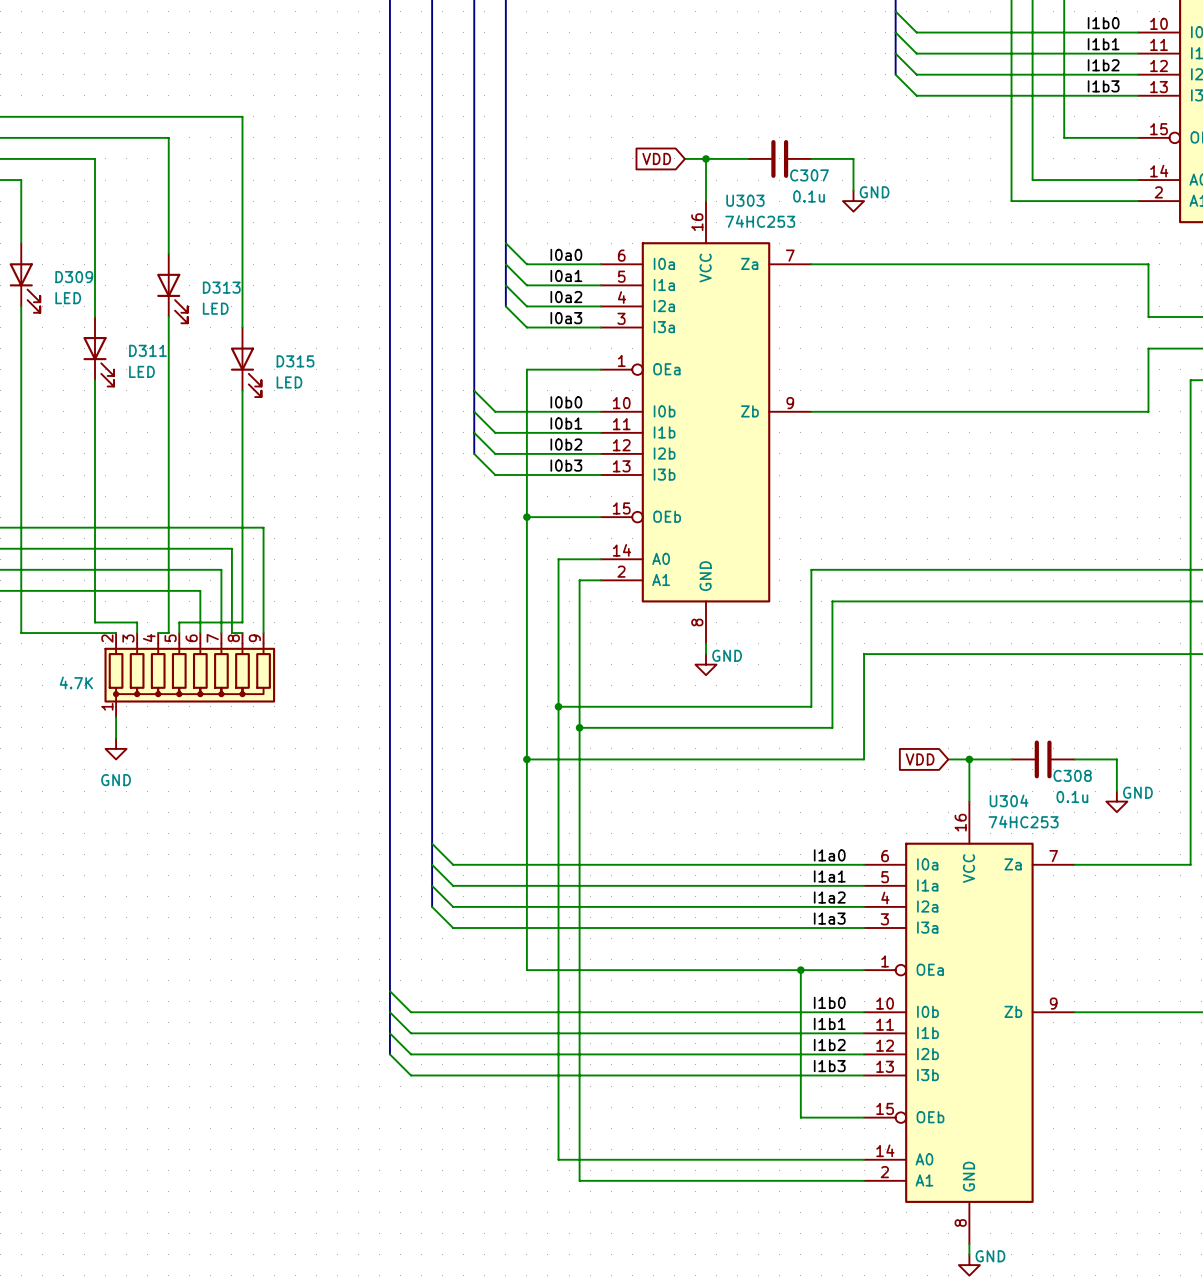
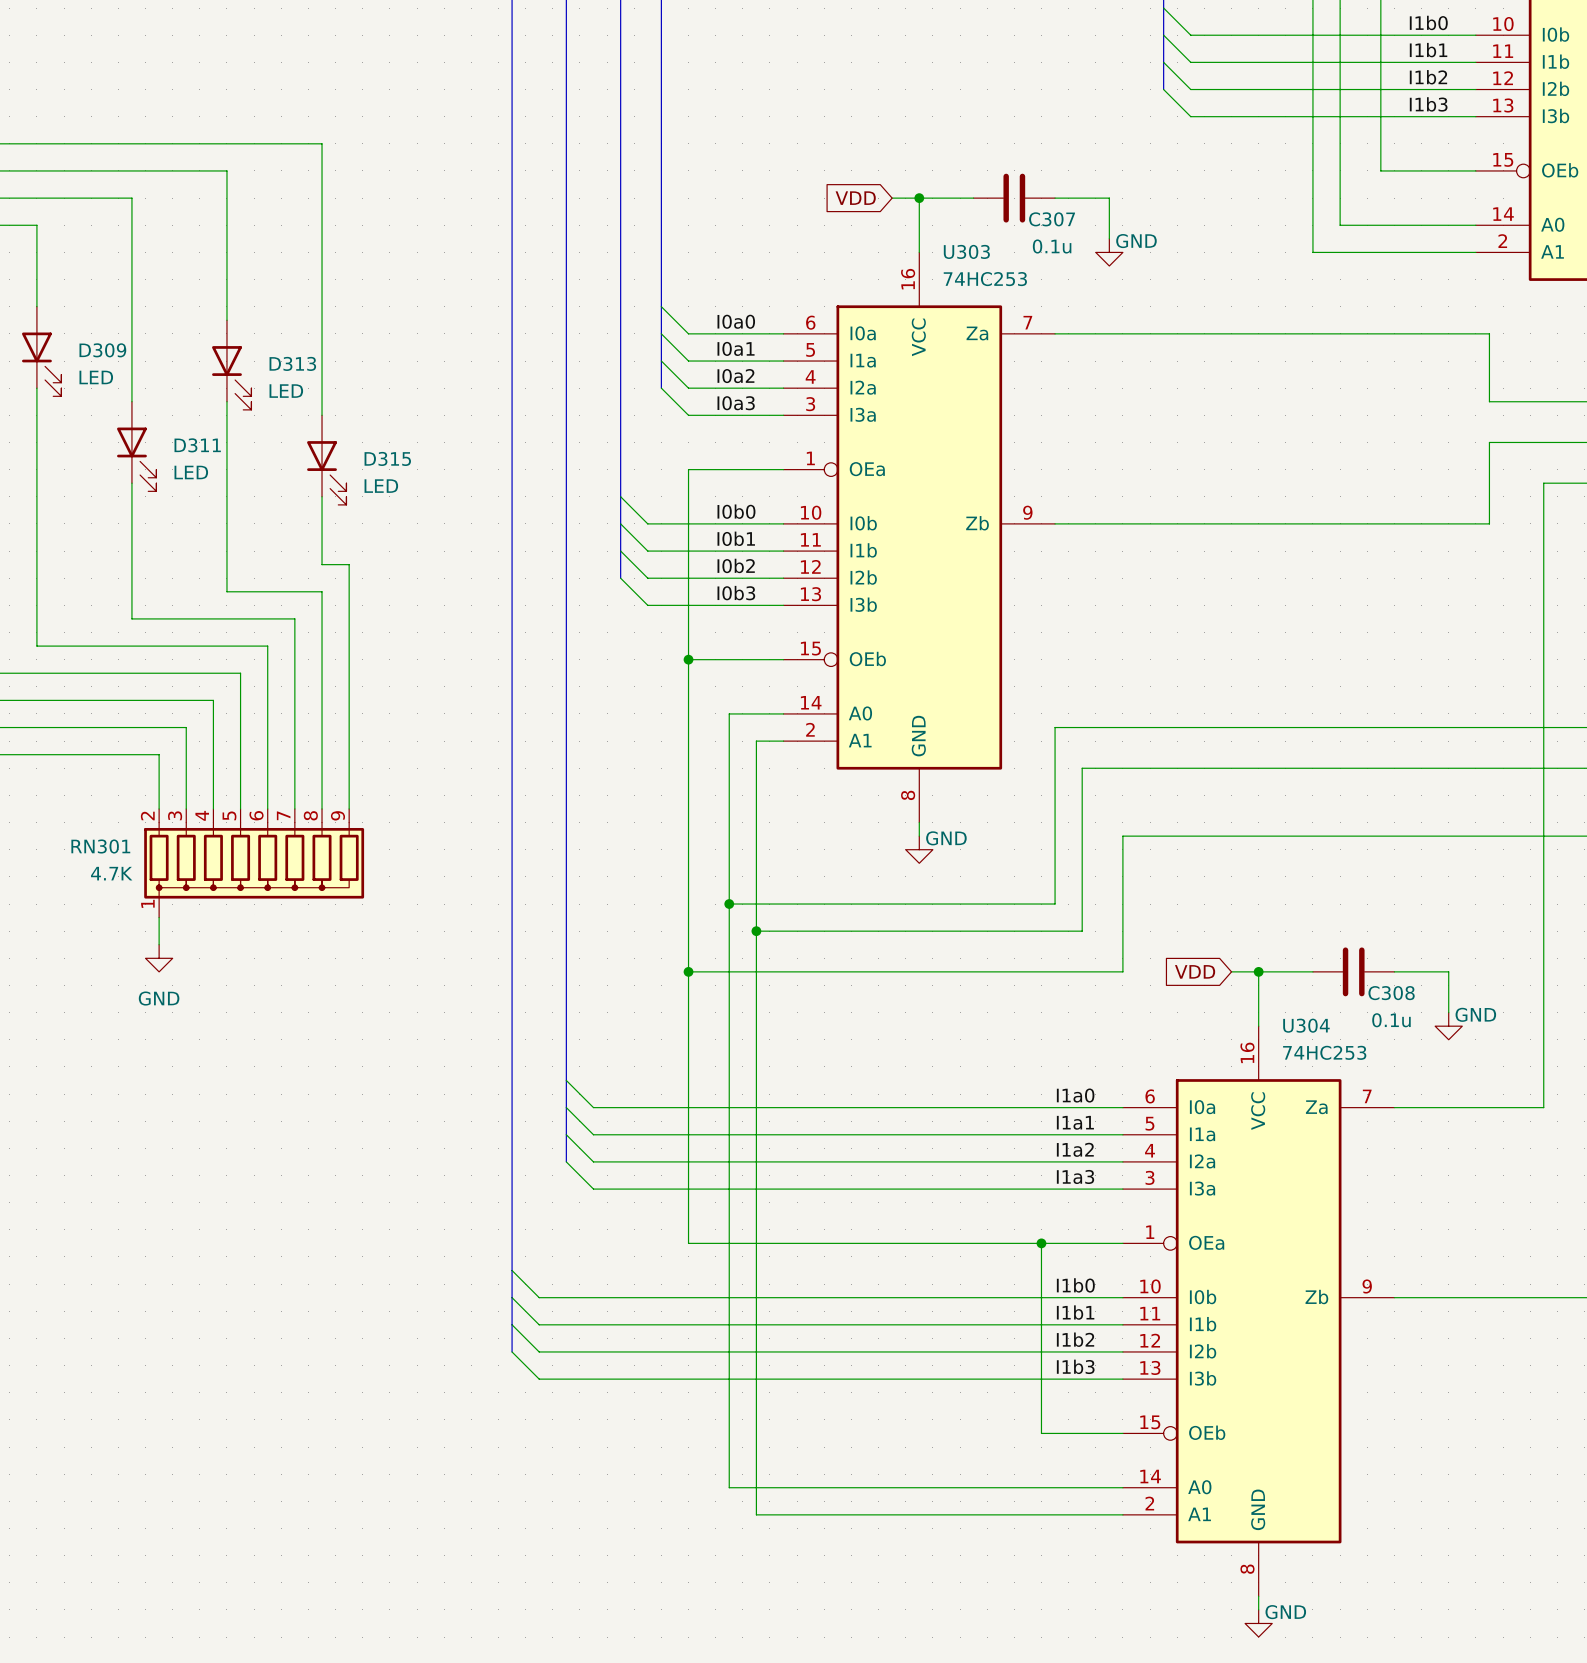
wire: (242, 443) (242, 464) -> (322, 564) (349, 564) (349, 673)
wire: (168, 464) (168, 633) (158, 633) -> (226, 591) (322, 591)
wire: (94, 485) (94, 622) (137, 622) -> (186, 727) (186, 795)
wire: (21, 506) (21, 633) (116, 633) -> (36, 646) (267, 646) (267, 754)
wire: (179, 527) (263, 527) -> (240, 673) (240, 795)
wire: (158, 548) (231, 548) (231, 633) (242, 633) -> (213, 700) (213, 808)
wire: (137, 569) (221, 569) -> (131, 618) (294, 618) (294, 727)
wire: (116, 590) (200, 590) -> (159, 754) (159, 808)
wire: (179, 622) (242, 622) -> (322, 808) (322, 795)
RN301 name: none -> RN301 (100, 846)

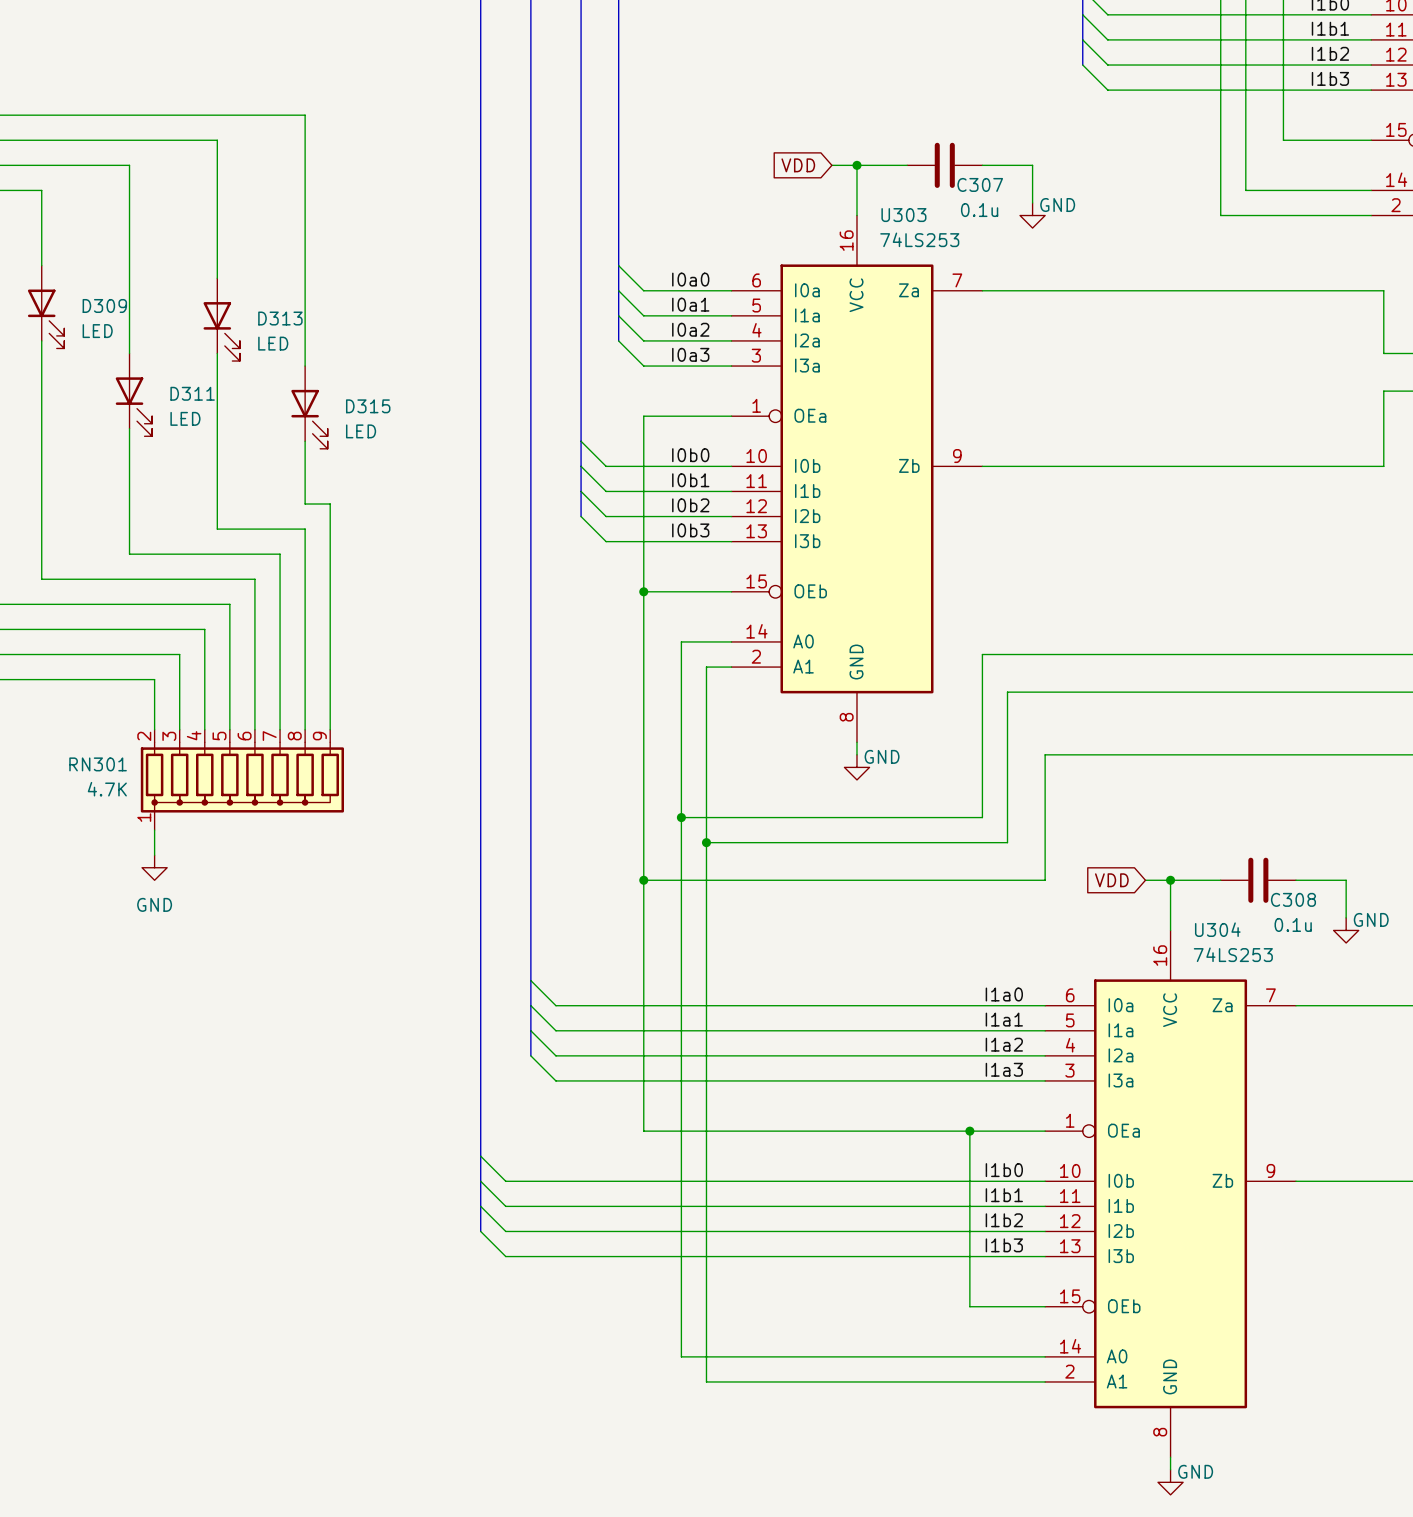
U303 value: 74HC253 (985, 279) -> 74LS253 (919, 239)
U304 value: 74HC253 (1324, 1052) -> 74LS253 (1233, 954)

